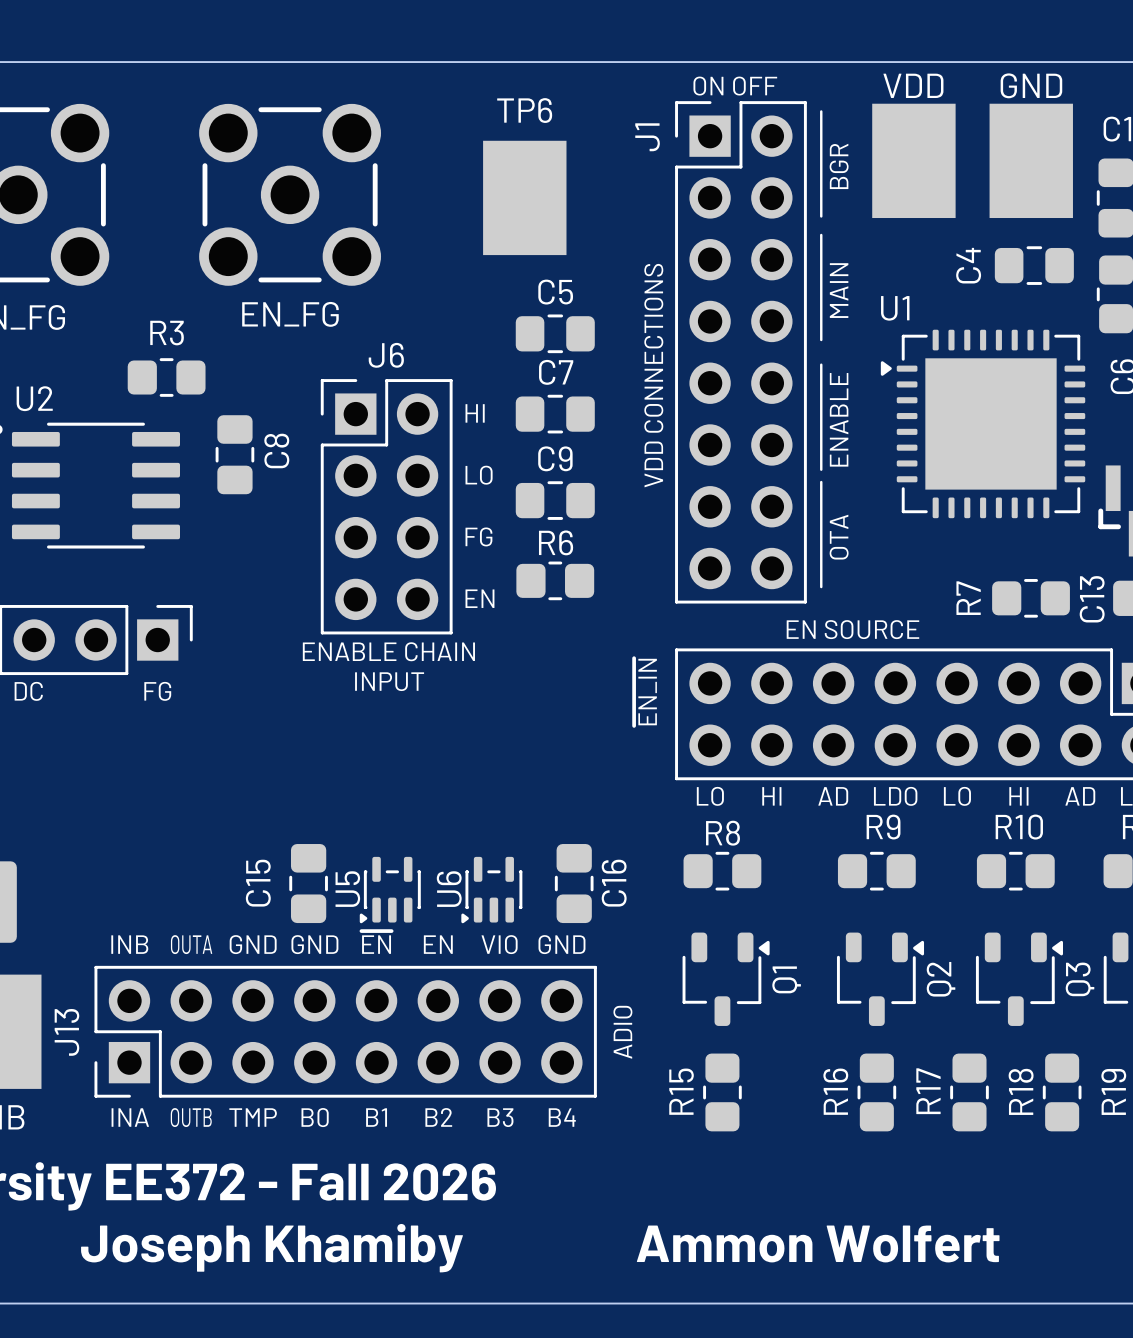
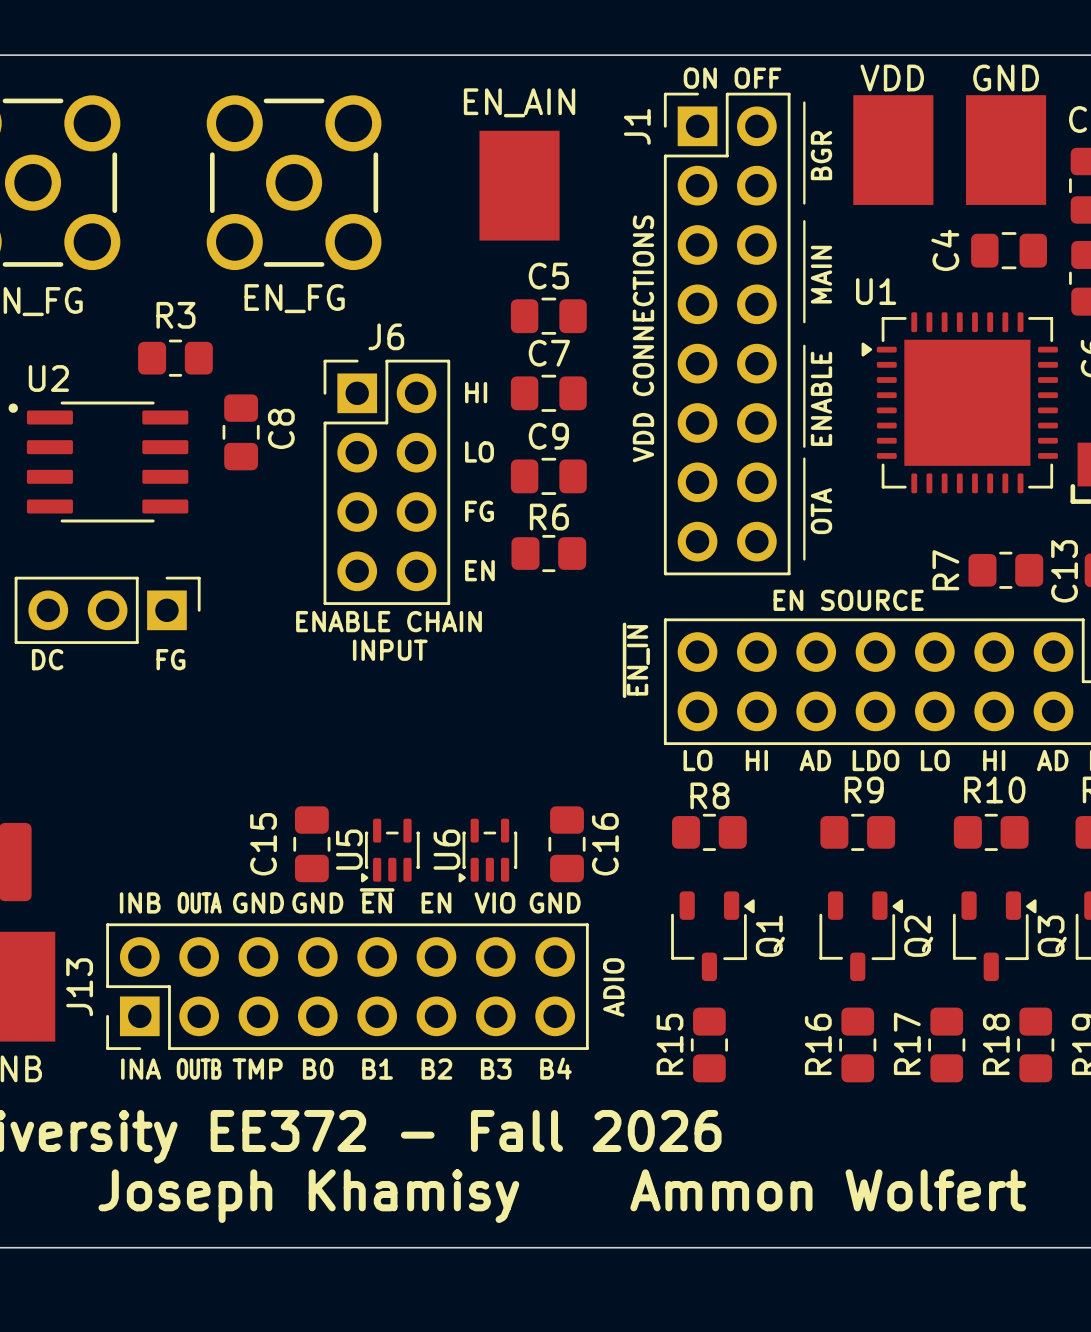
TP6 name: TP6 (524, 110) -> none
TP6 value: none -> EN_AIN (519, 102)
text: Joseph Khamiby (272, 1248) -> Joseph Khamisy (308, 1196)

